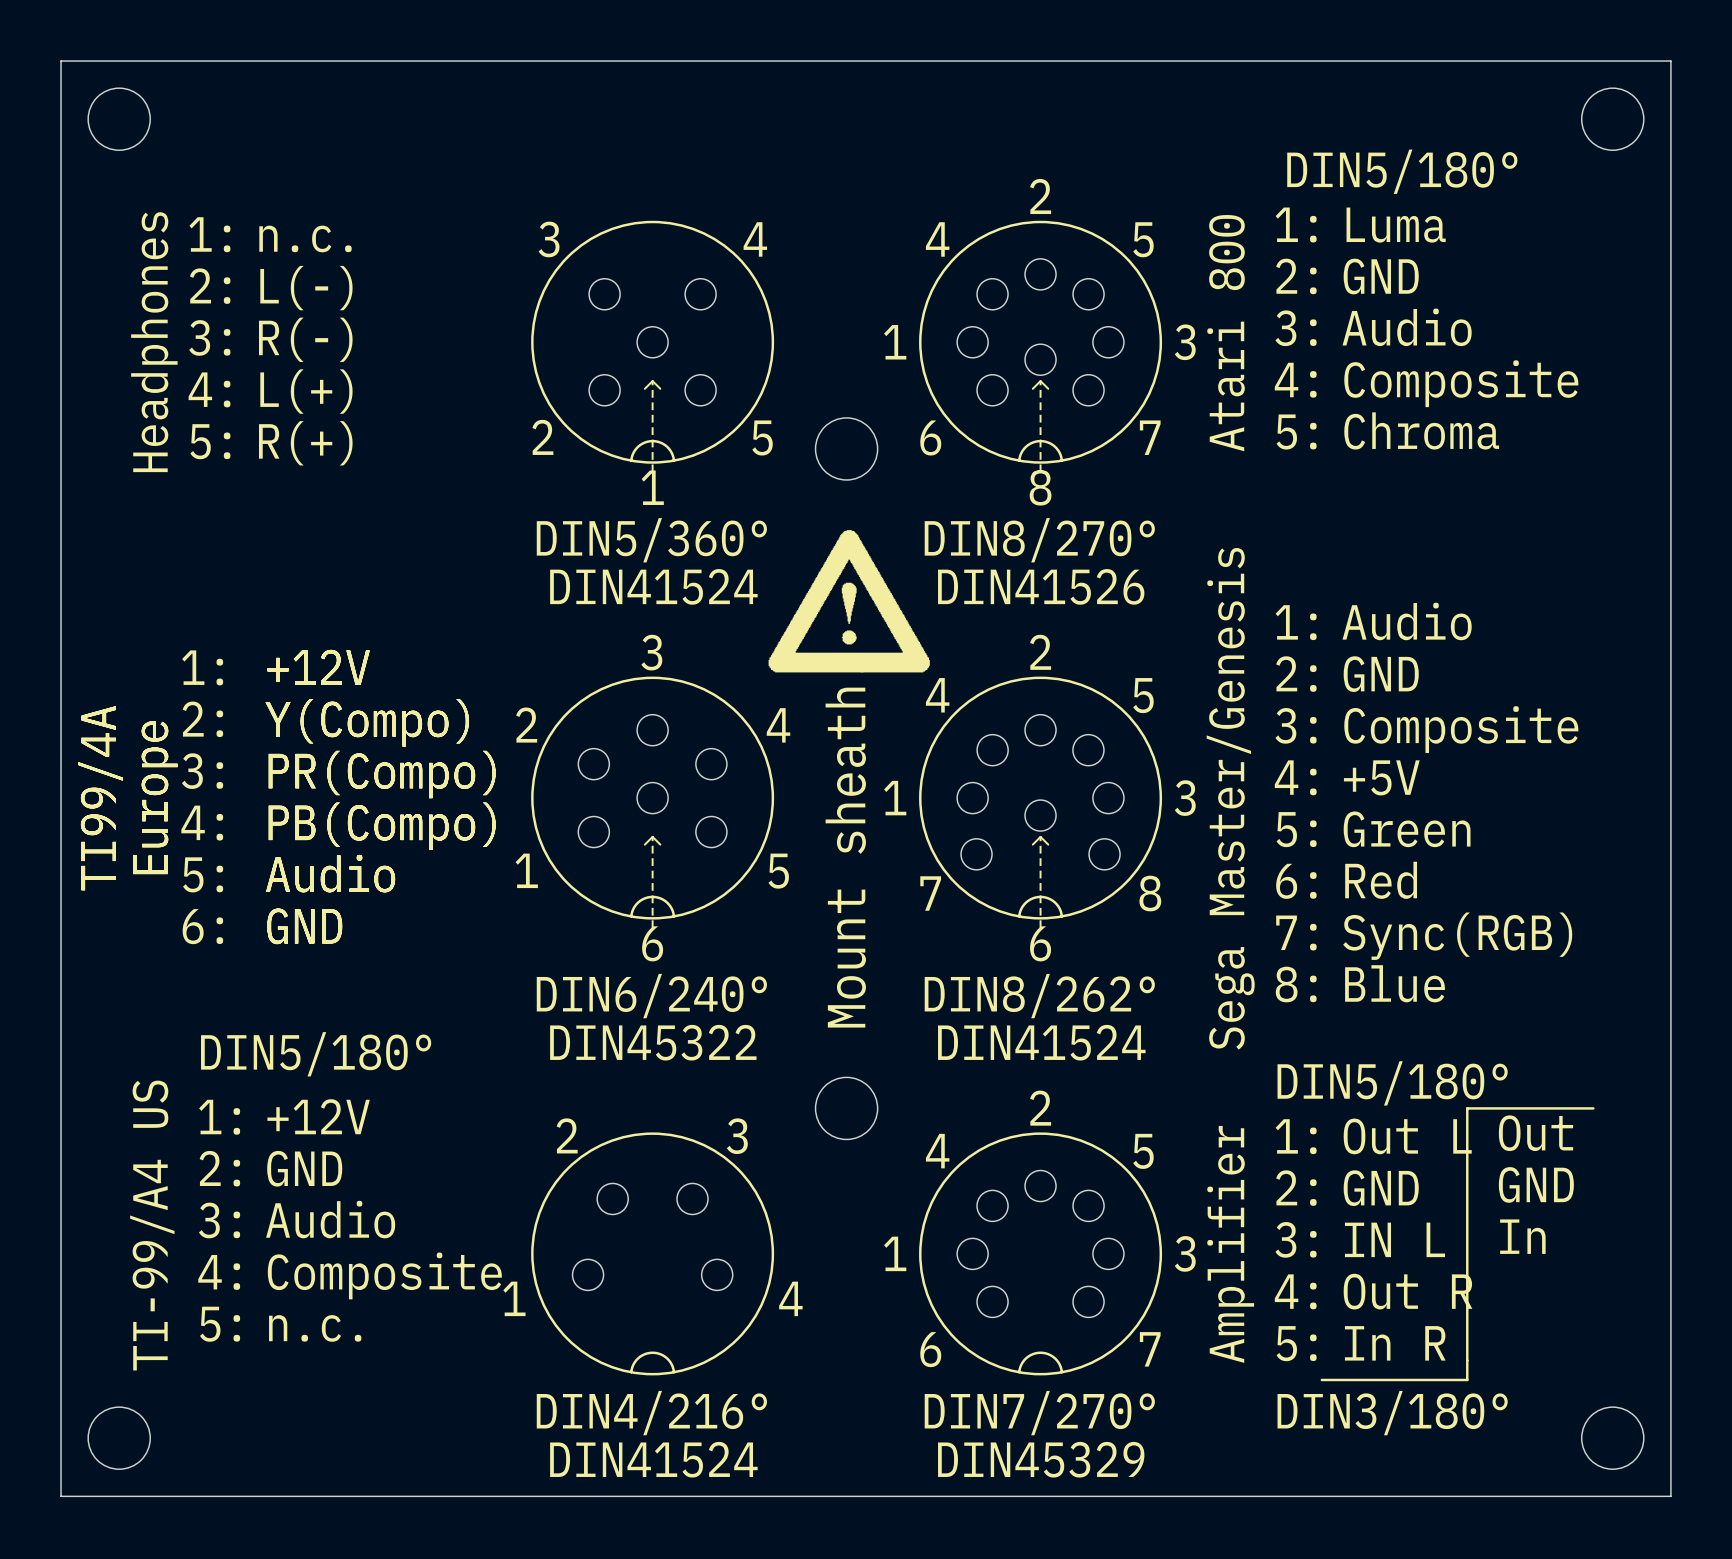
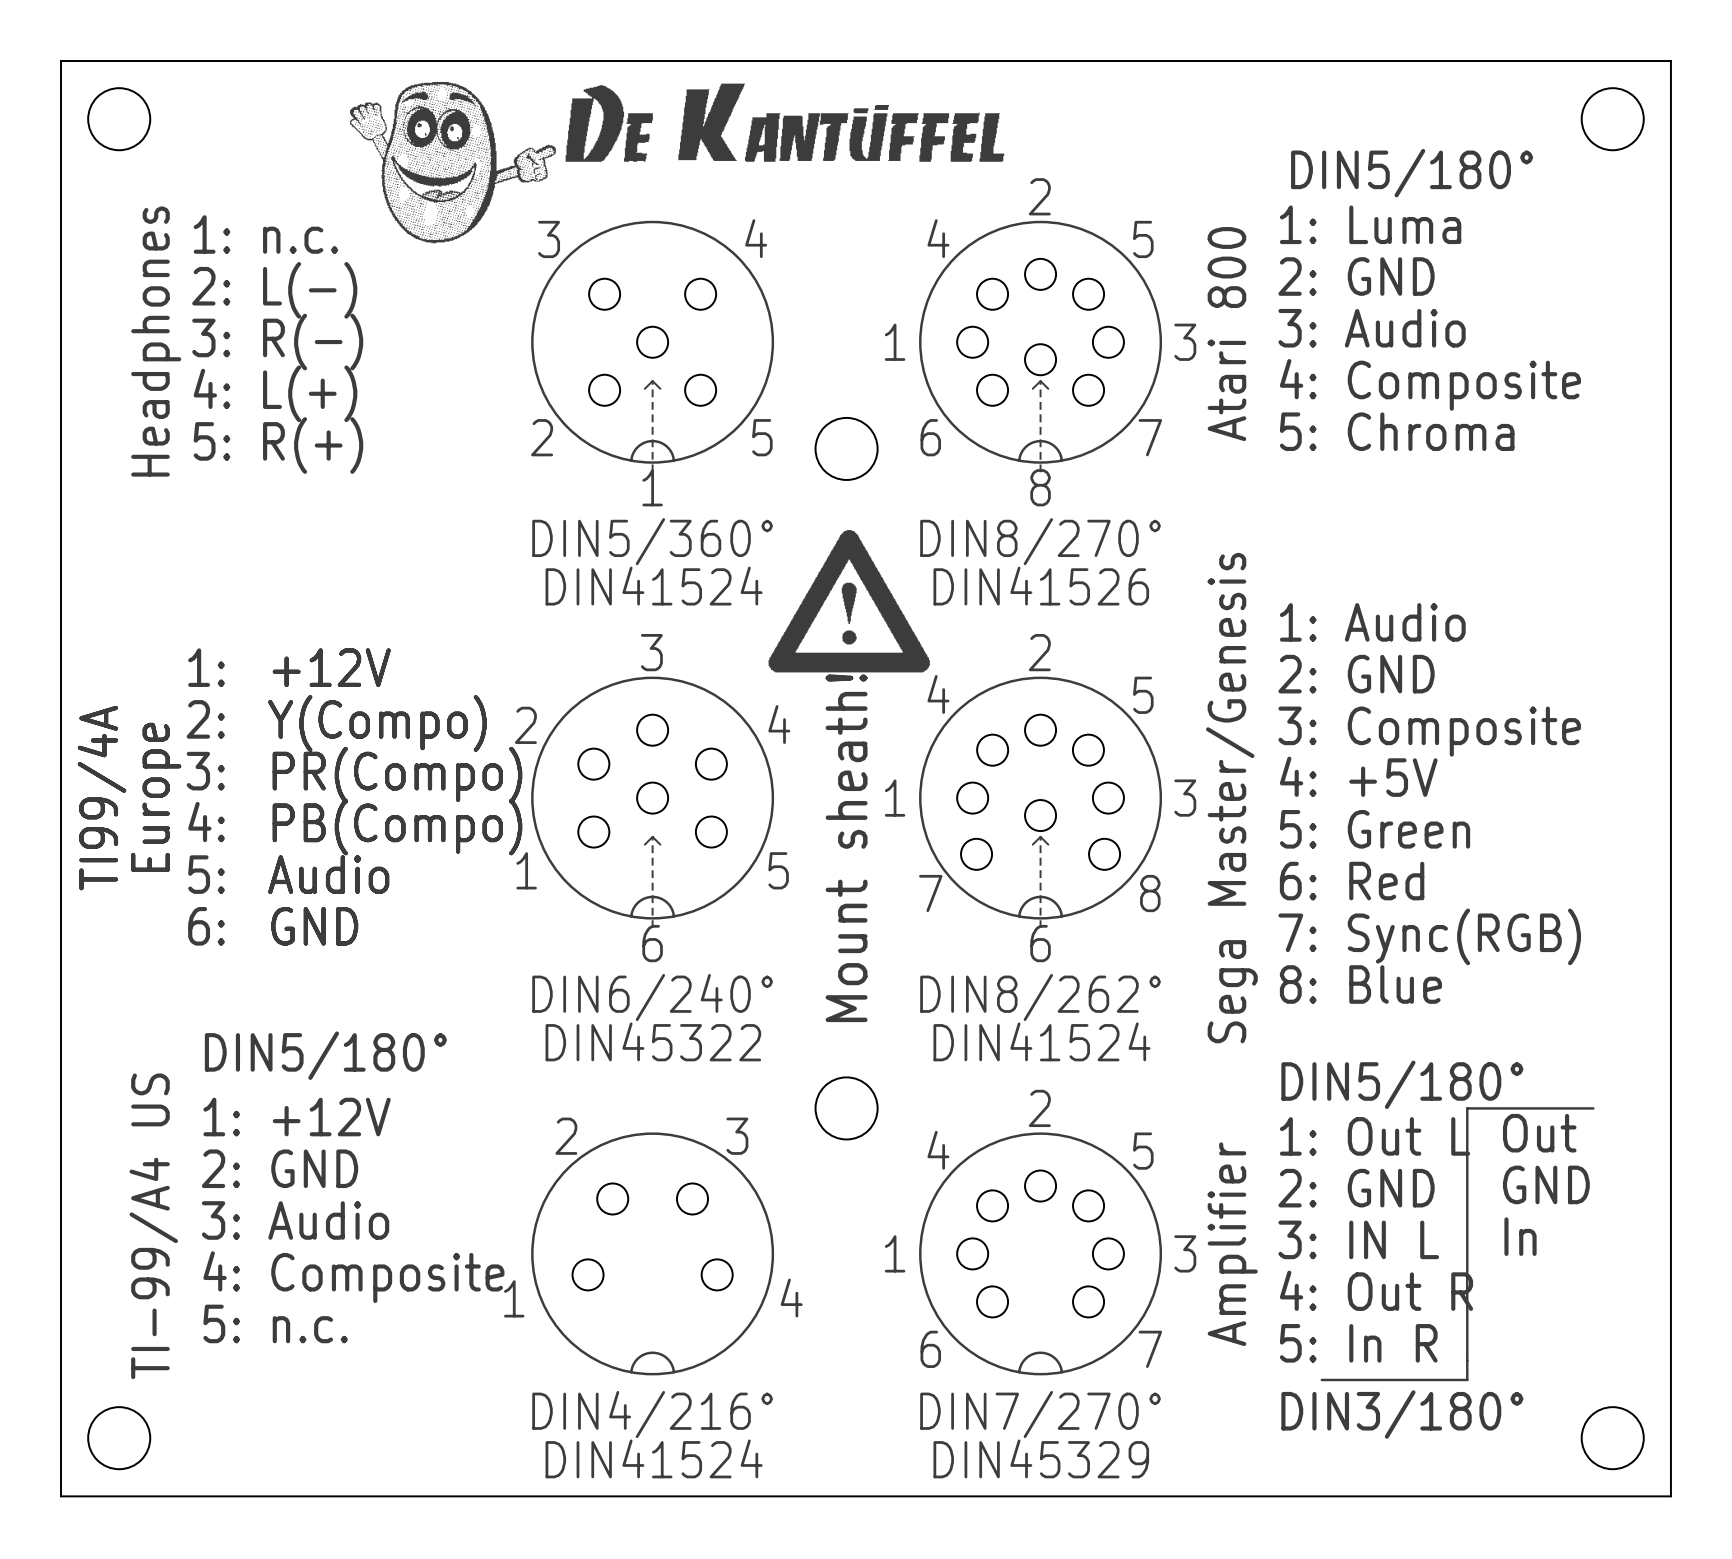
drawing: none -> [350, 81, 1005, 244]

